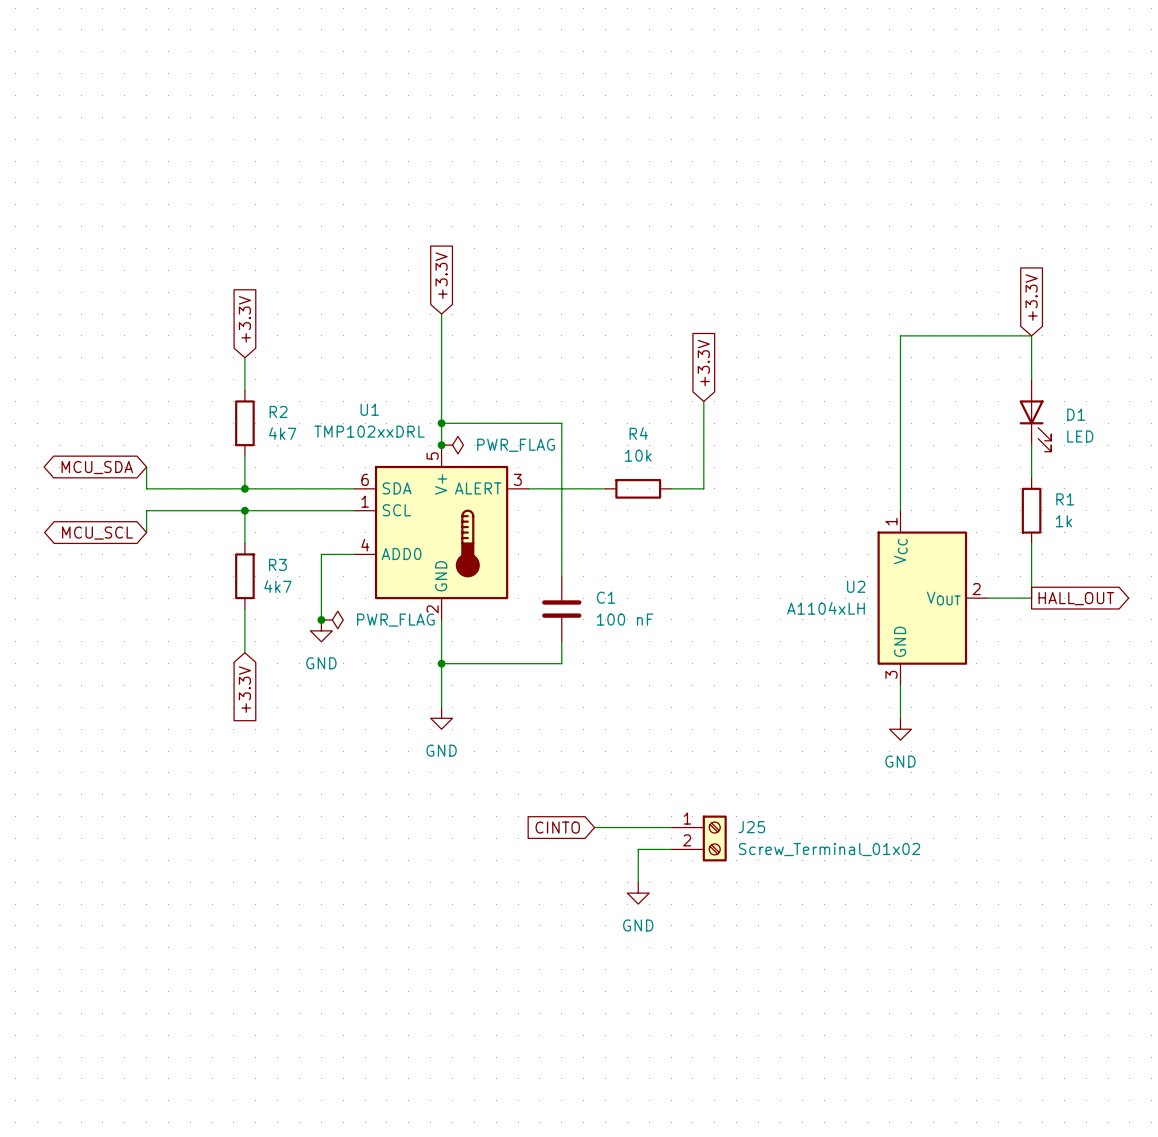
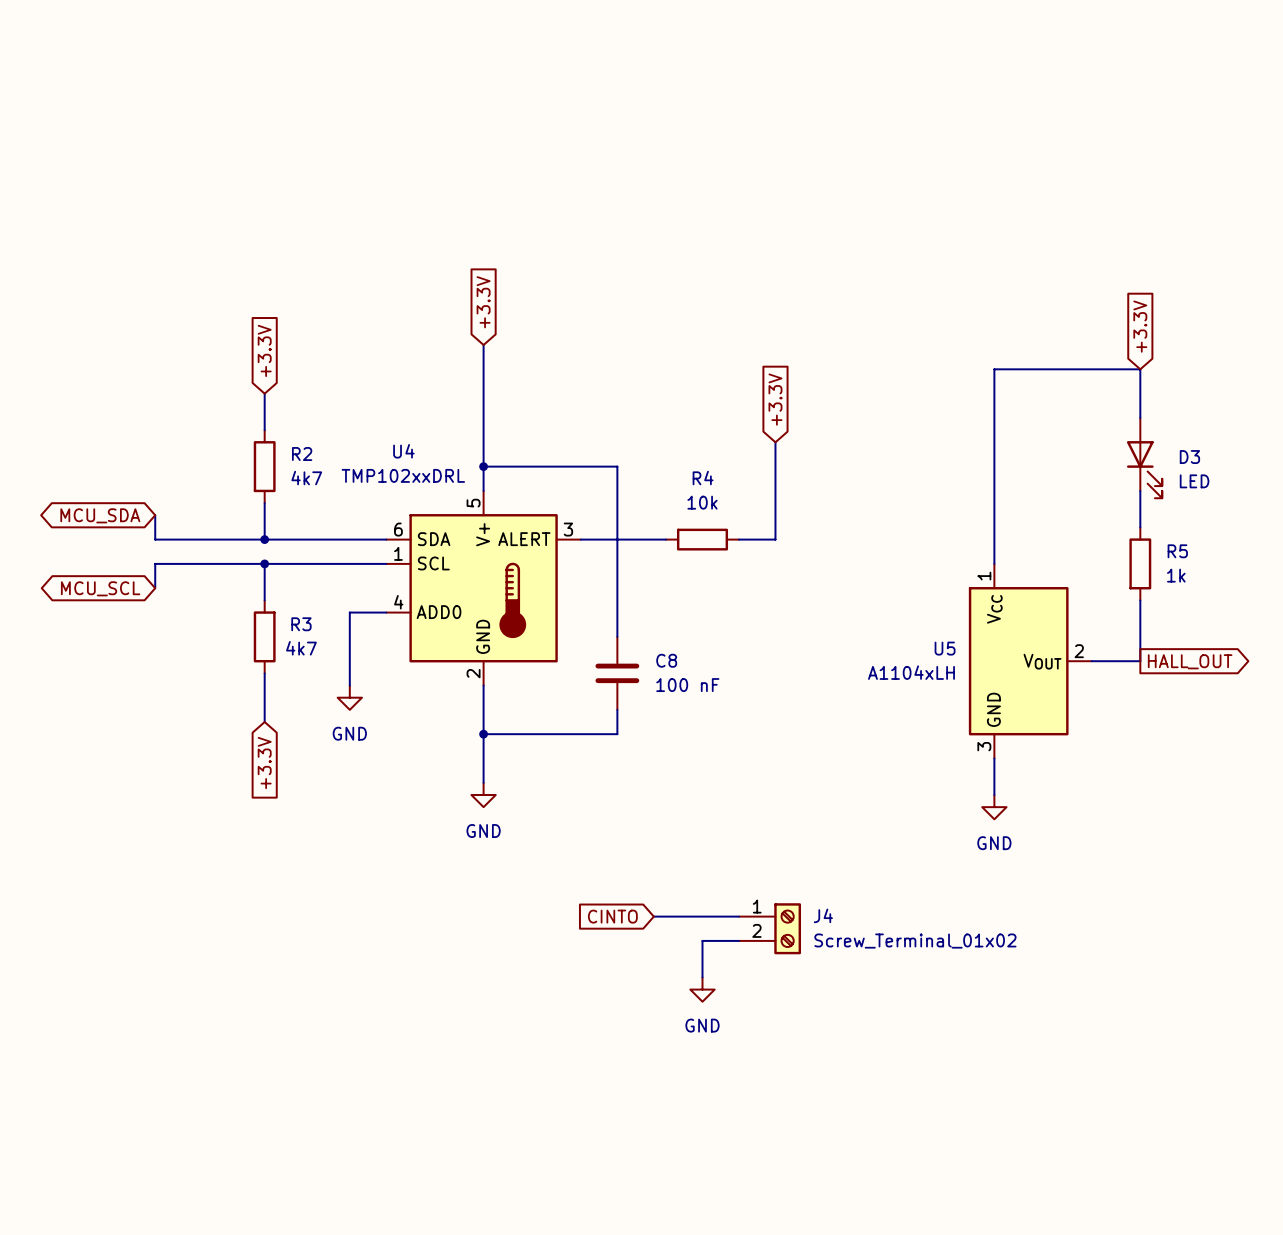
U1 name: U1 (369, 409) -> U4 (403, 451)
D1 name: D1 (1076, 414) -> D3 (1189, 457)
junction: (441, 445) -> none
power symbol: PWR_FLAG (452, 445) -> none
R1 name: R1 (1065, 499) -> R5 (1177, 551)
U2 name: U2 (856, 586) -> U5 (945, 648)
C1 name: C1 (606, 597) -> C8 (666, 660)
junction: (321, 619) -> none
power symbol: PWR_FLAG (332, 619) -> none
J25 name: J25 (751, 827) -> J4 (823, 915)

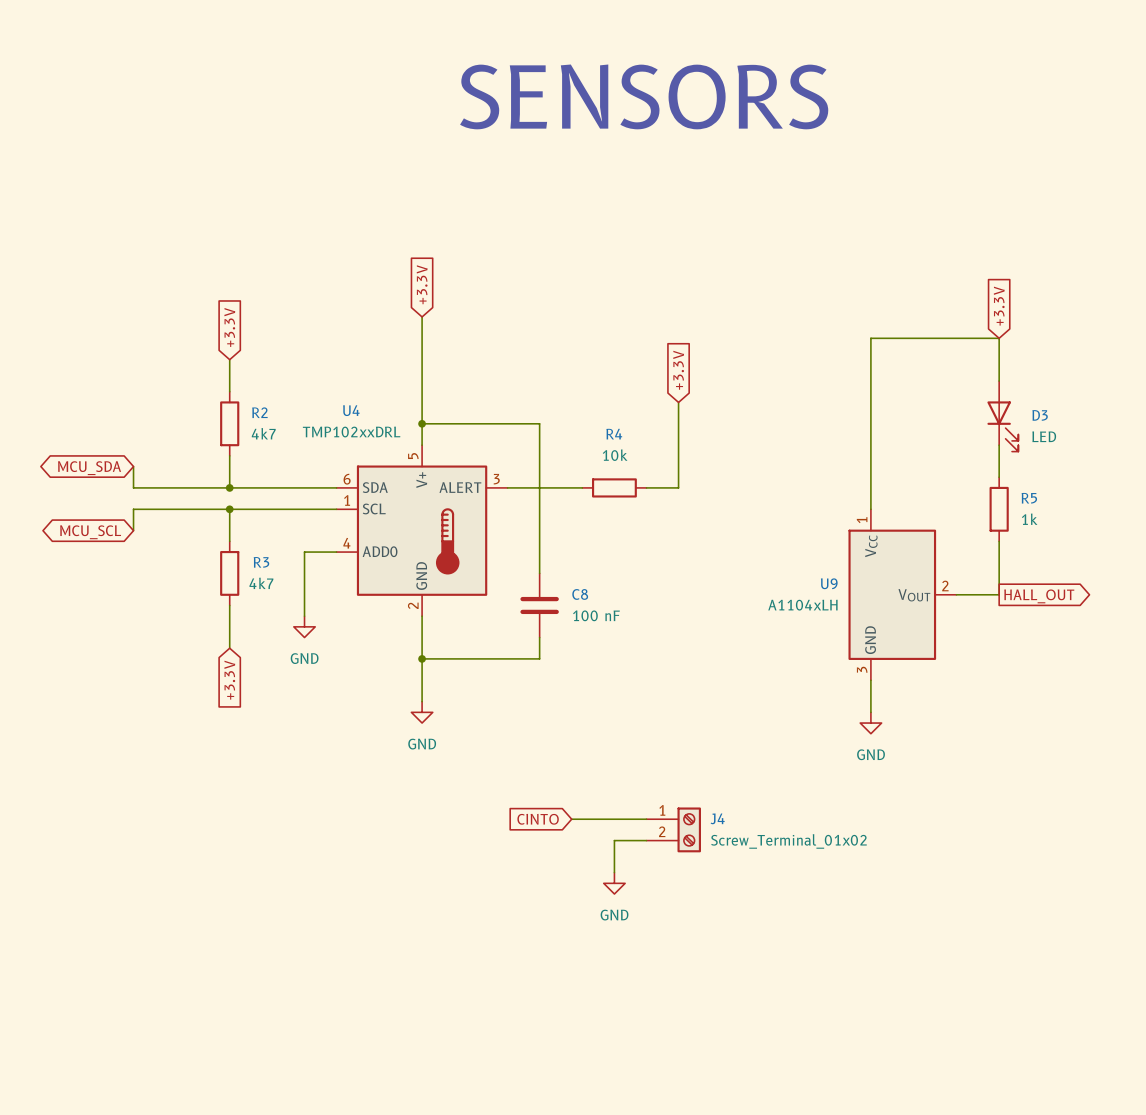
text: none -> SENSORS (644, 96)
U5 name: U5 (945, 648) -> U9 (829, 583)

